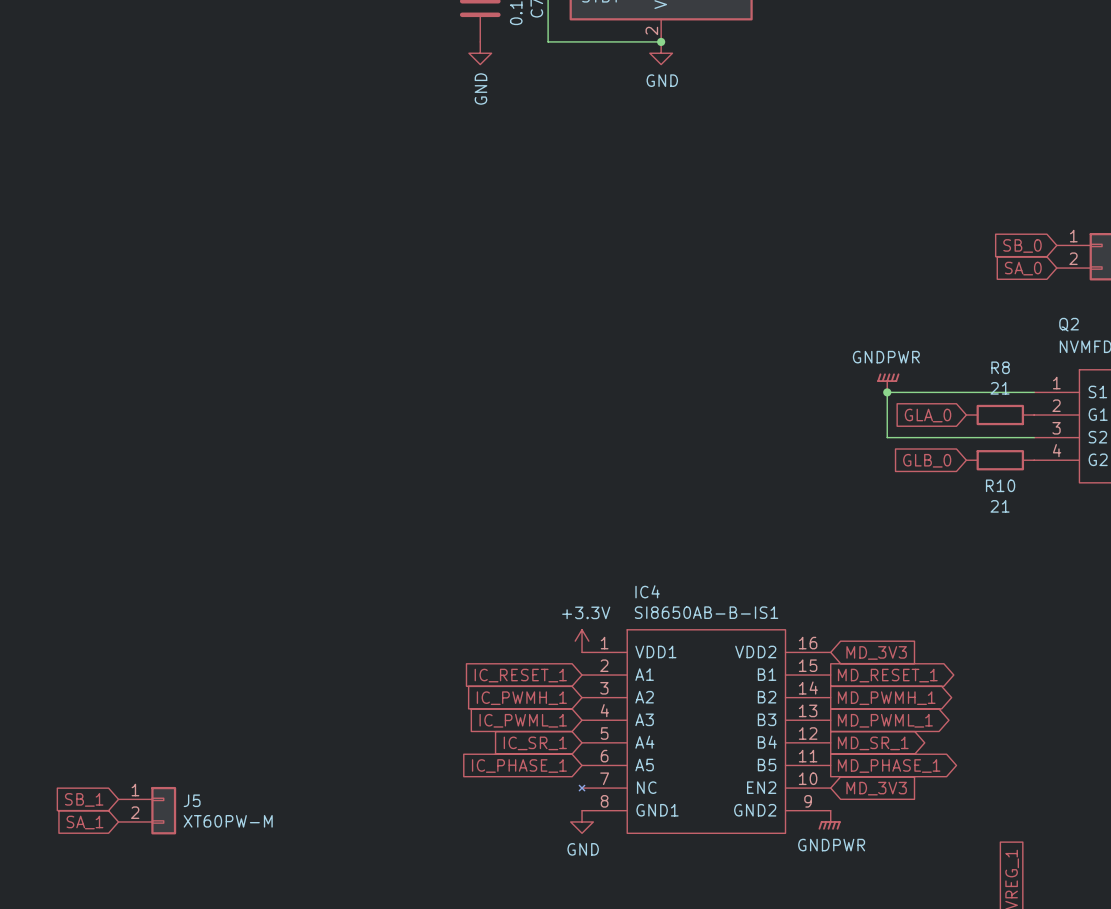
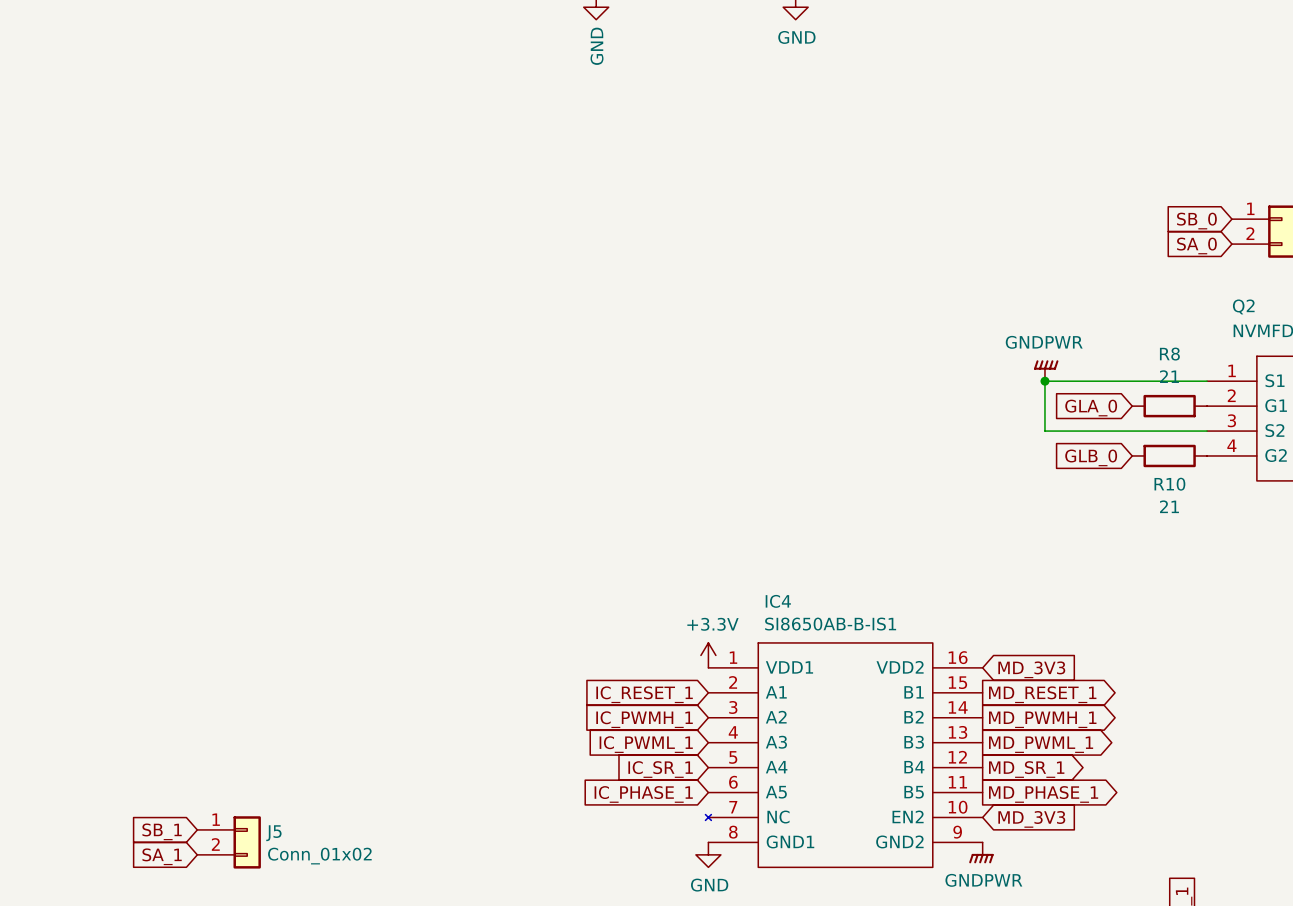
J5 value: XT60PW-M (228, 821) -> Conn_01x02 (319, 856)

